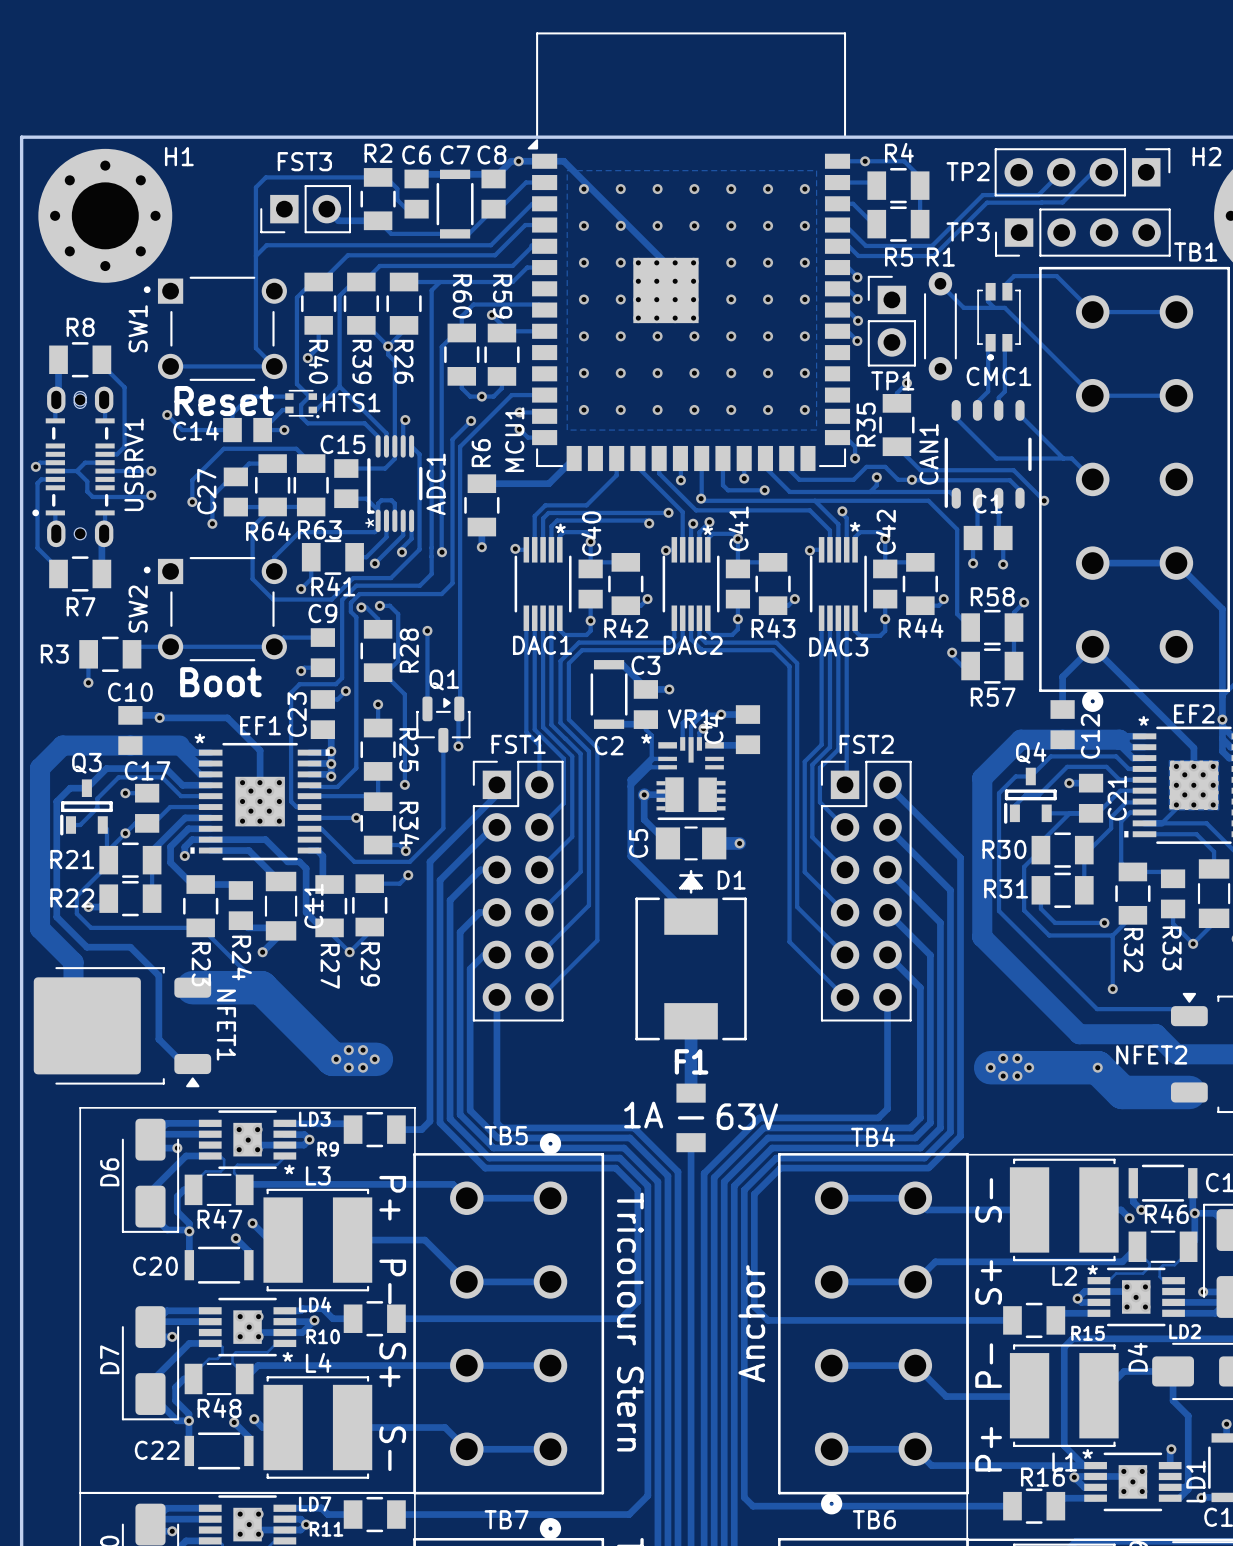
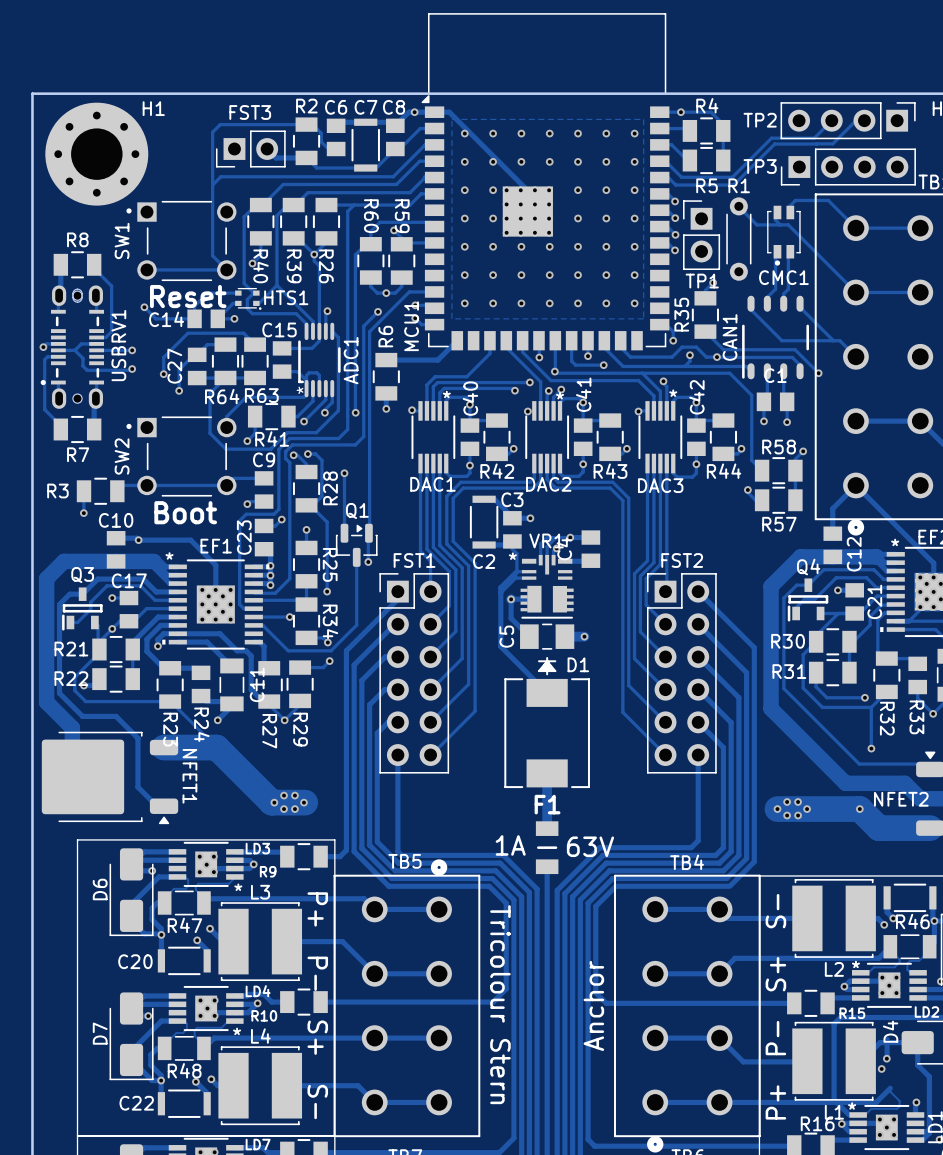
track: none -> (887, 1039) (886, 1058)
via: none -> (886, 1058)
via: none -> (881, 1068)
track: (915, 1449) (931, 1465) (1095, 1465) -> (719, 1102) (876, 1102) (890, 1088) (890, 1091) (899, 1101) (899, 1106) (897, 1108) (871, 1108) (865, 1114) (858, 1114)

